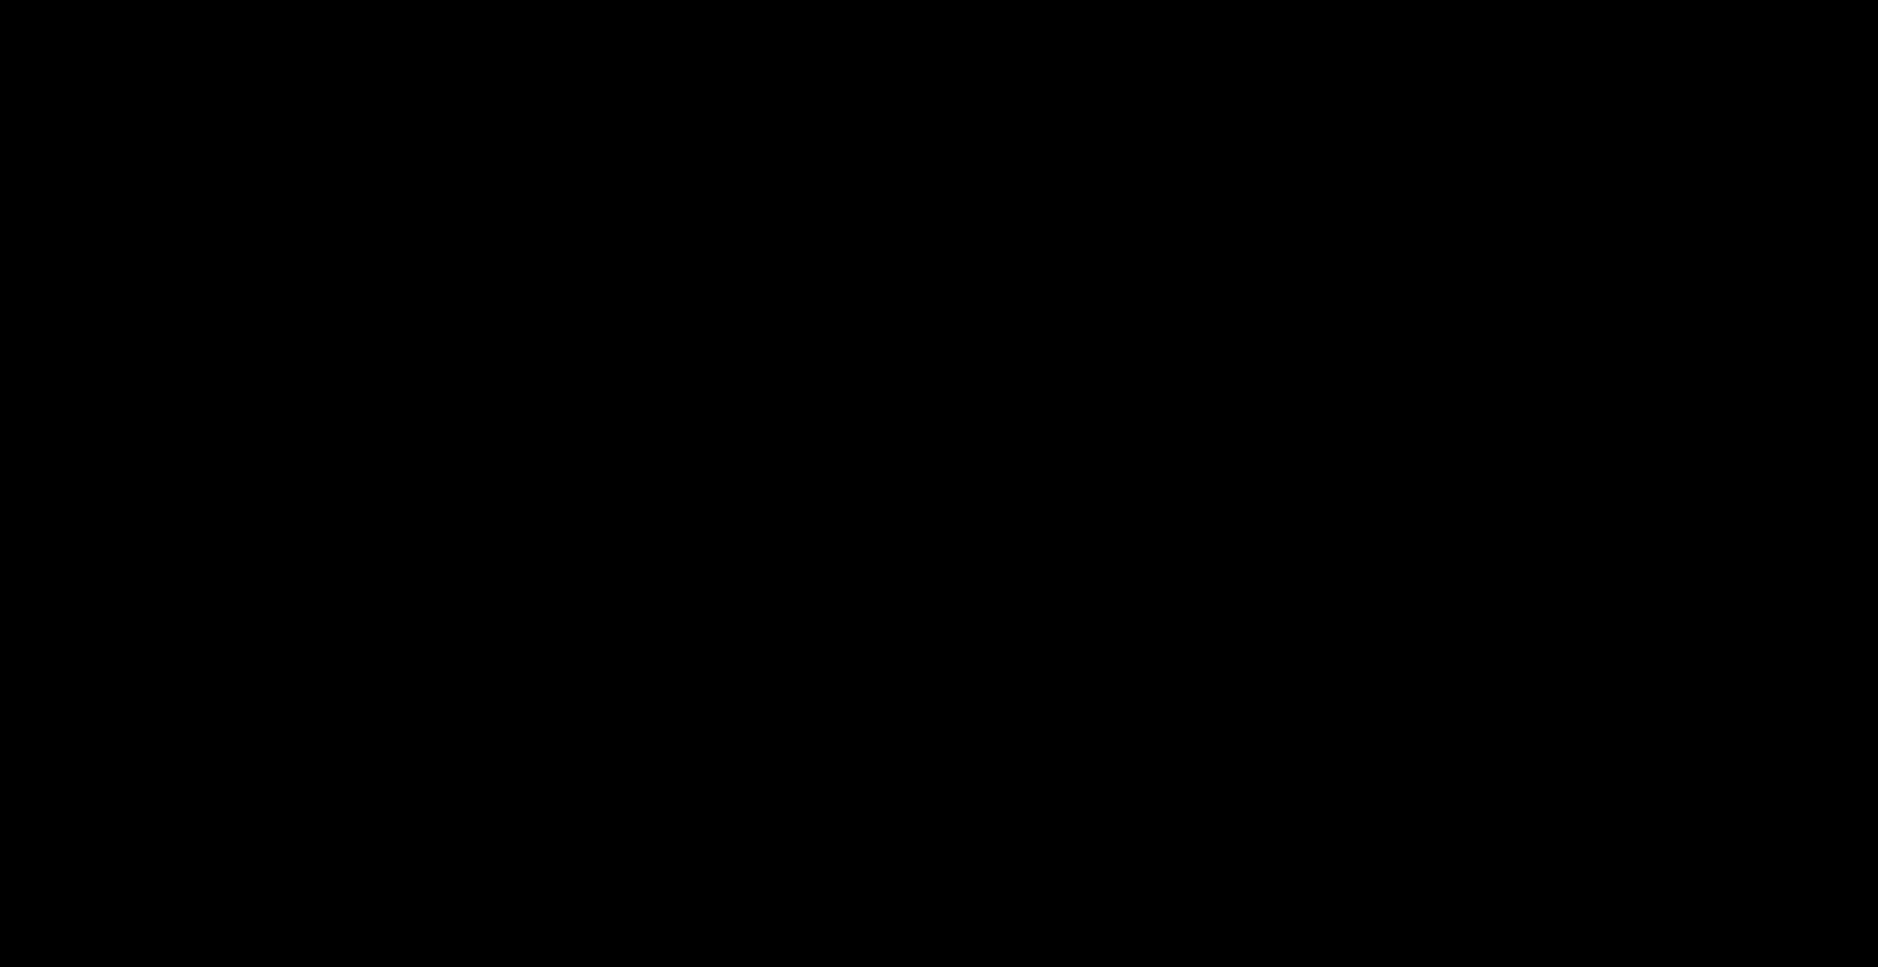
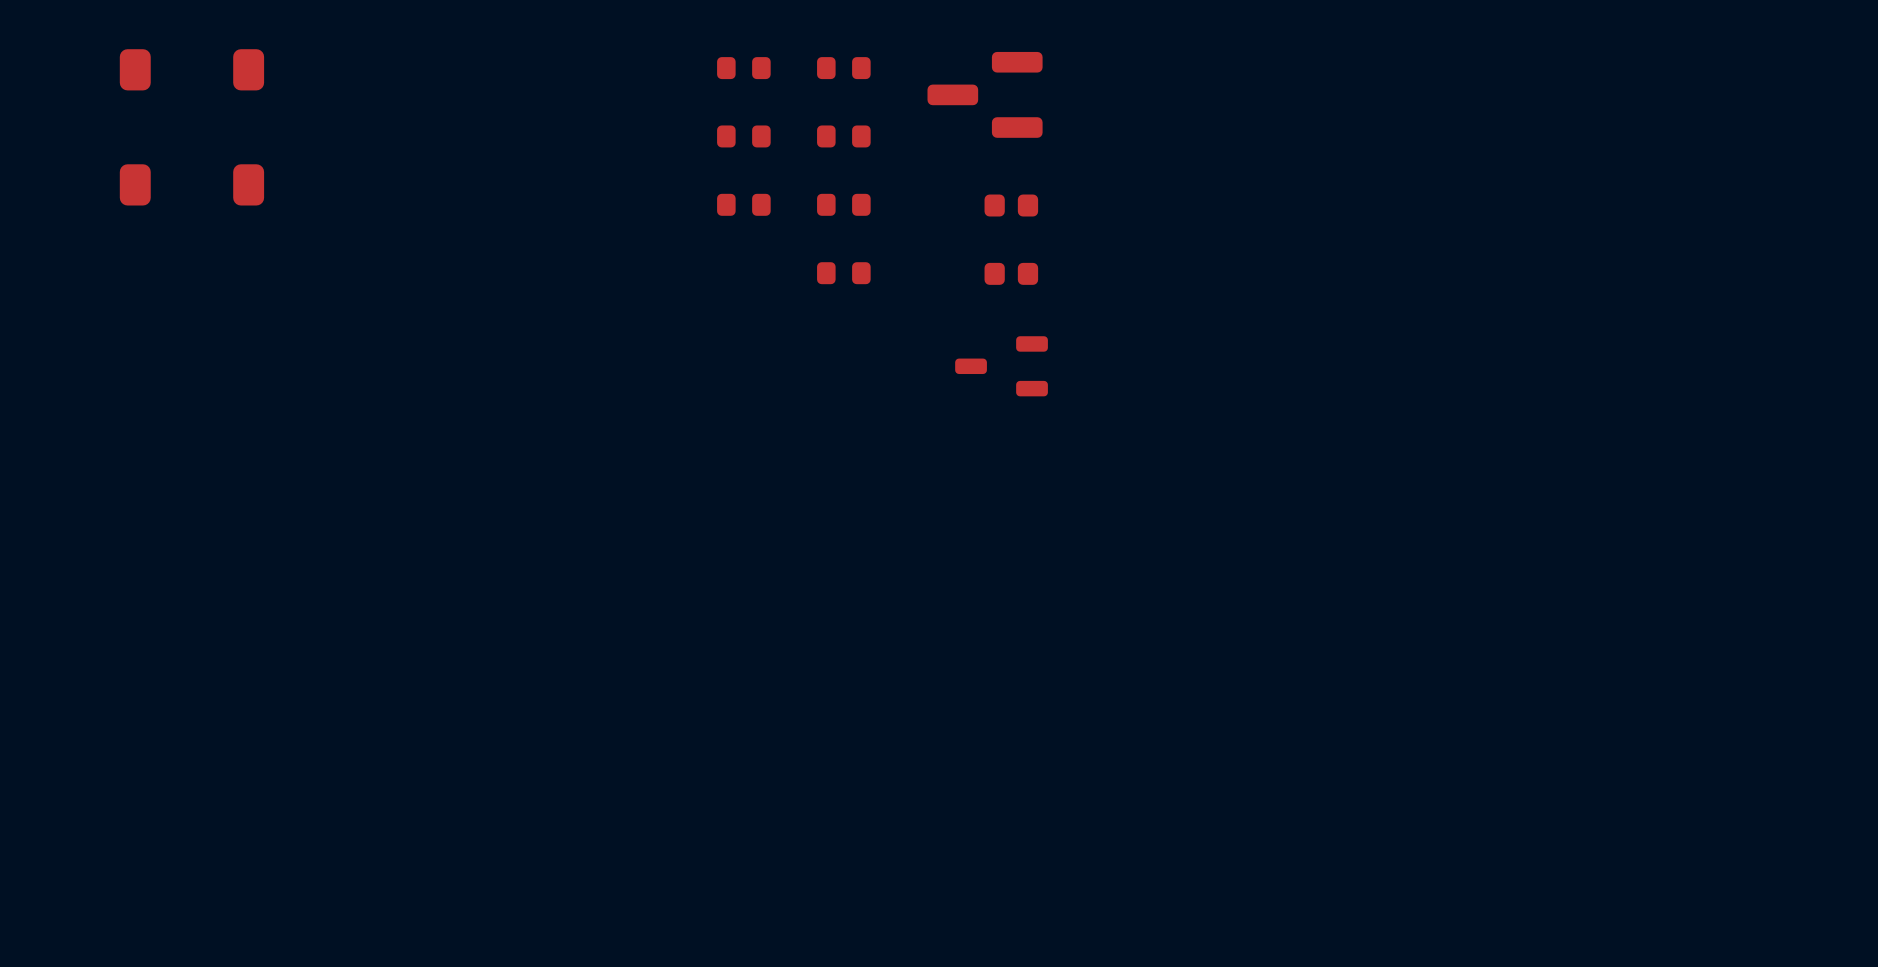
part: none -> (743, 68)
part: none -> (843, 68)
part: none -> (191, 69)
part: none -> (985, 94)
part: none -> (743, 136)
part: none -> (843, 136)
part: none -> (191, 184)
part: none -> (743, 204)
part: none -> (843, 204)
part: none -> (1011, 205)
part: none -> (843, 273)
part: none -> (1011, 273)
part: none -> (1001, 366)

